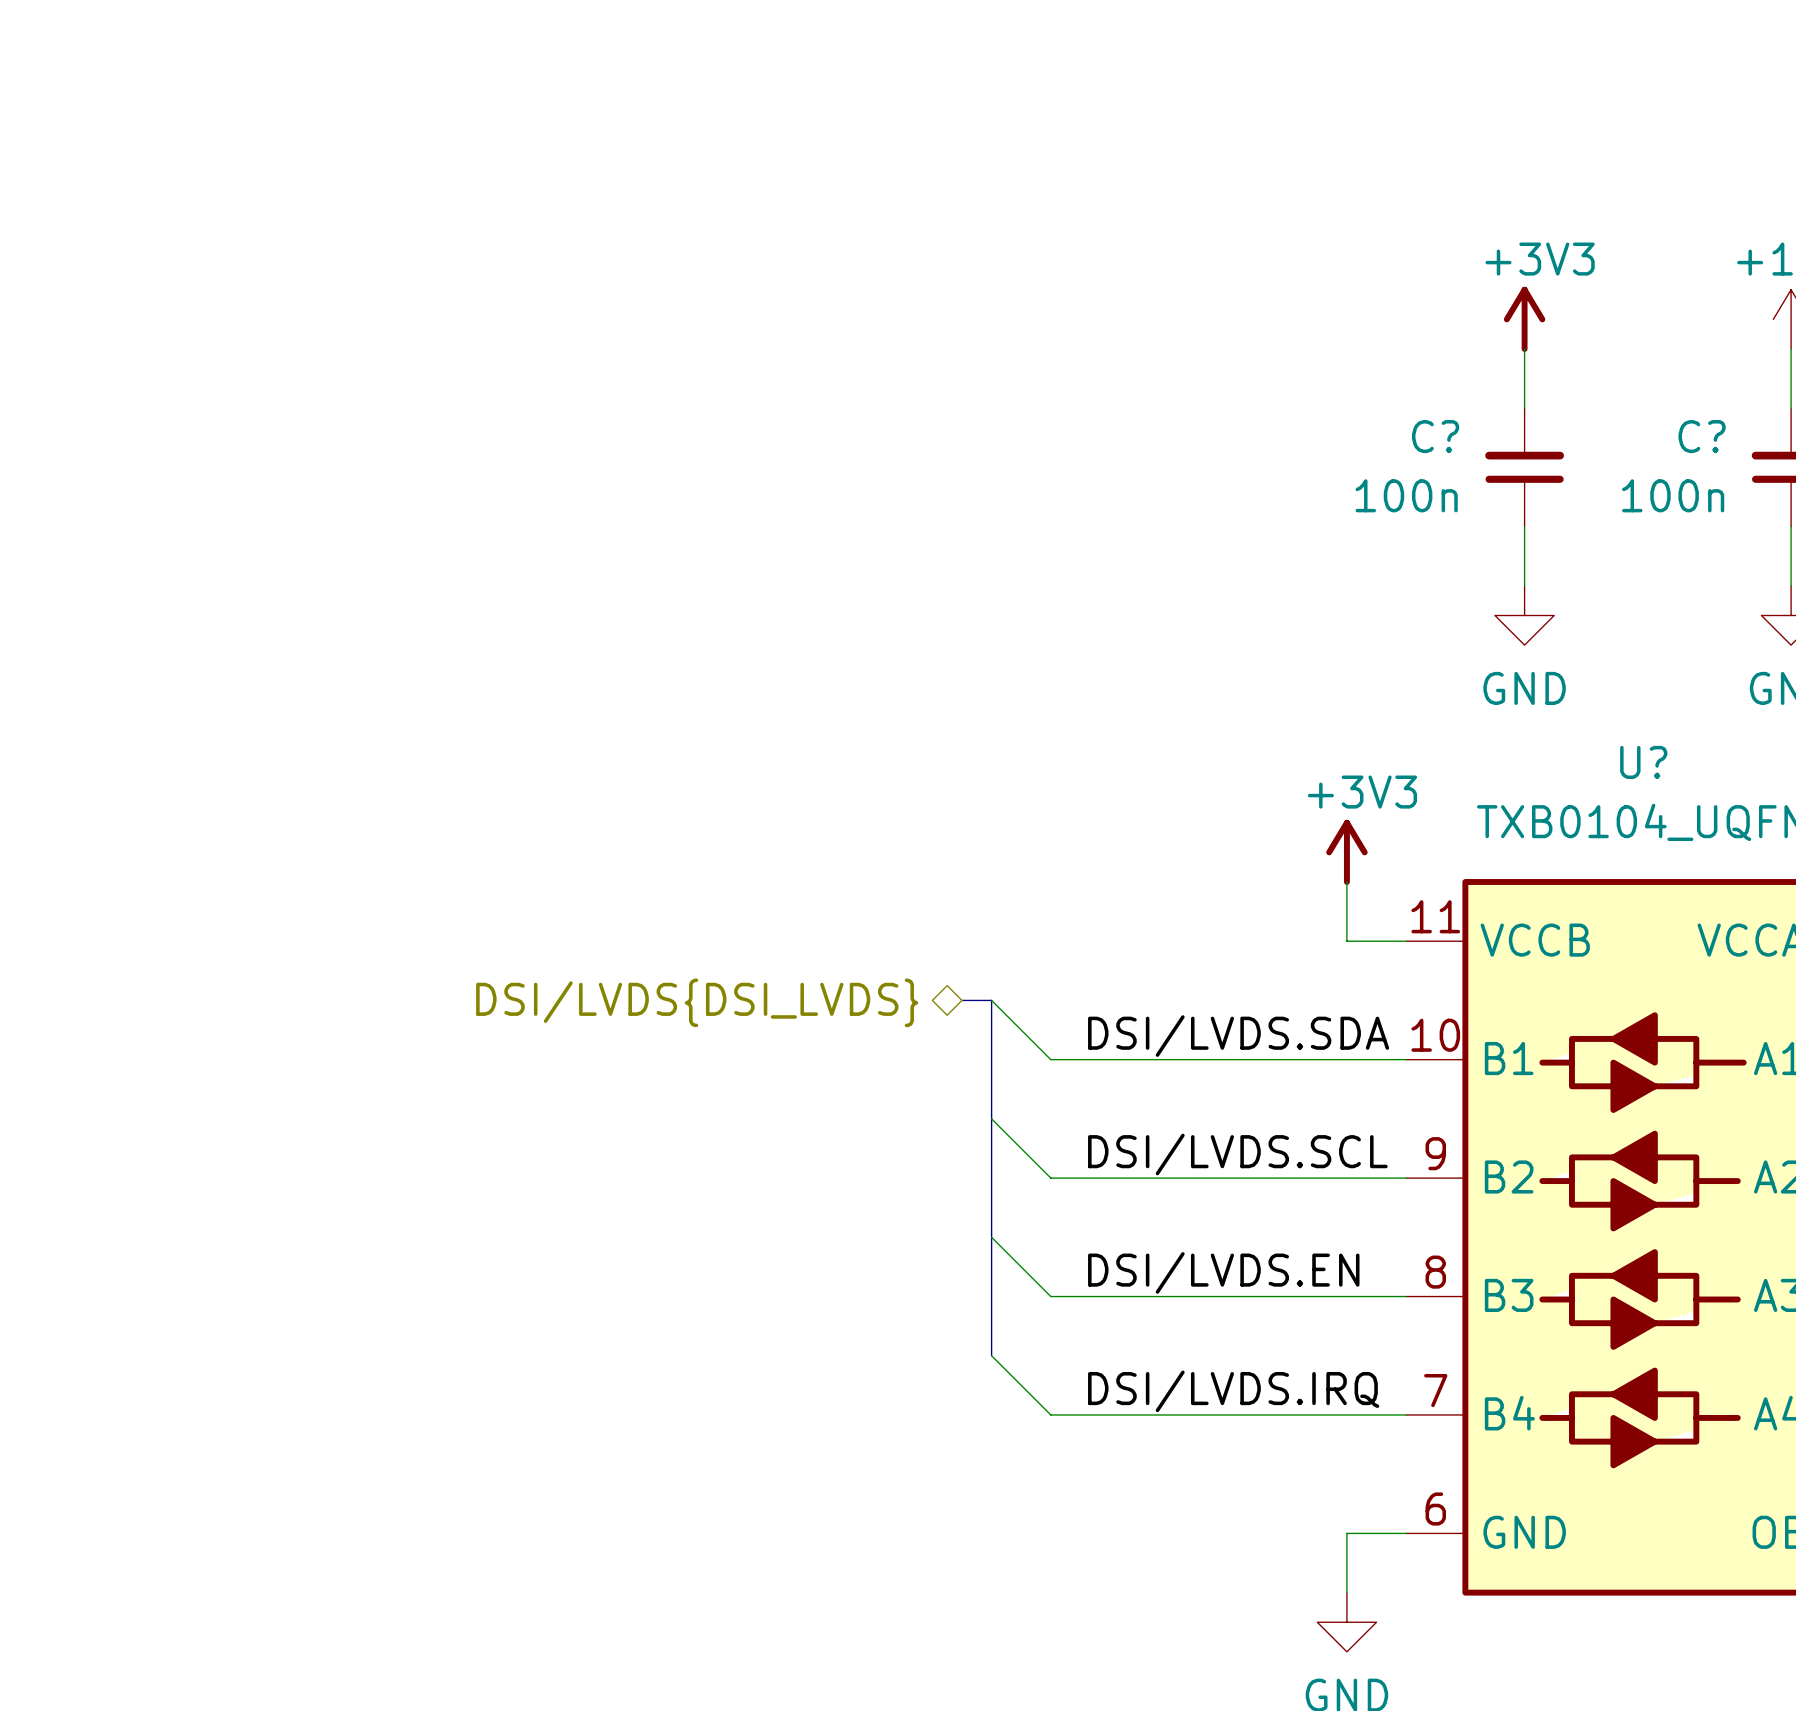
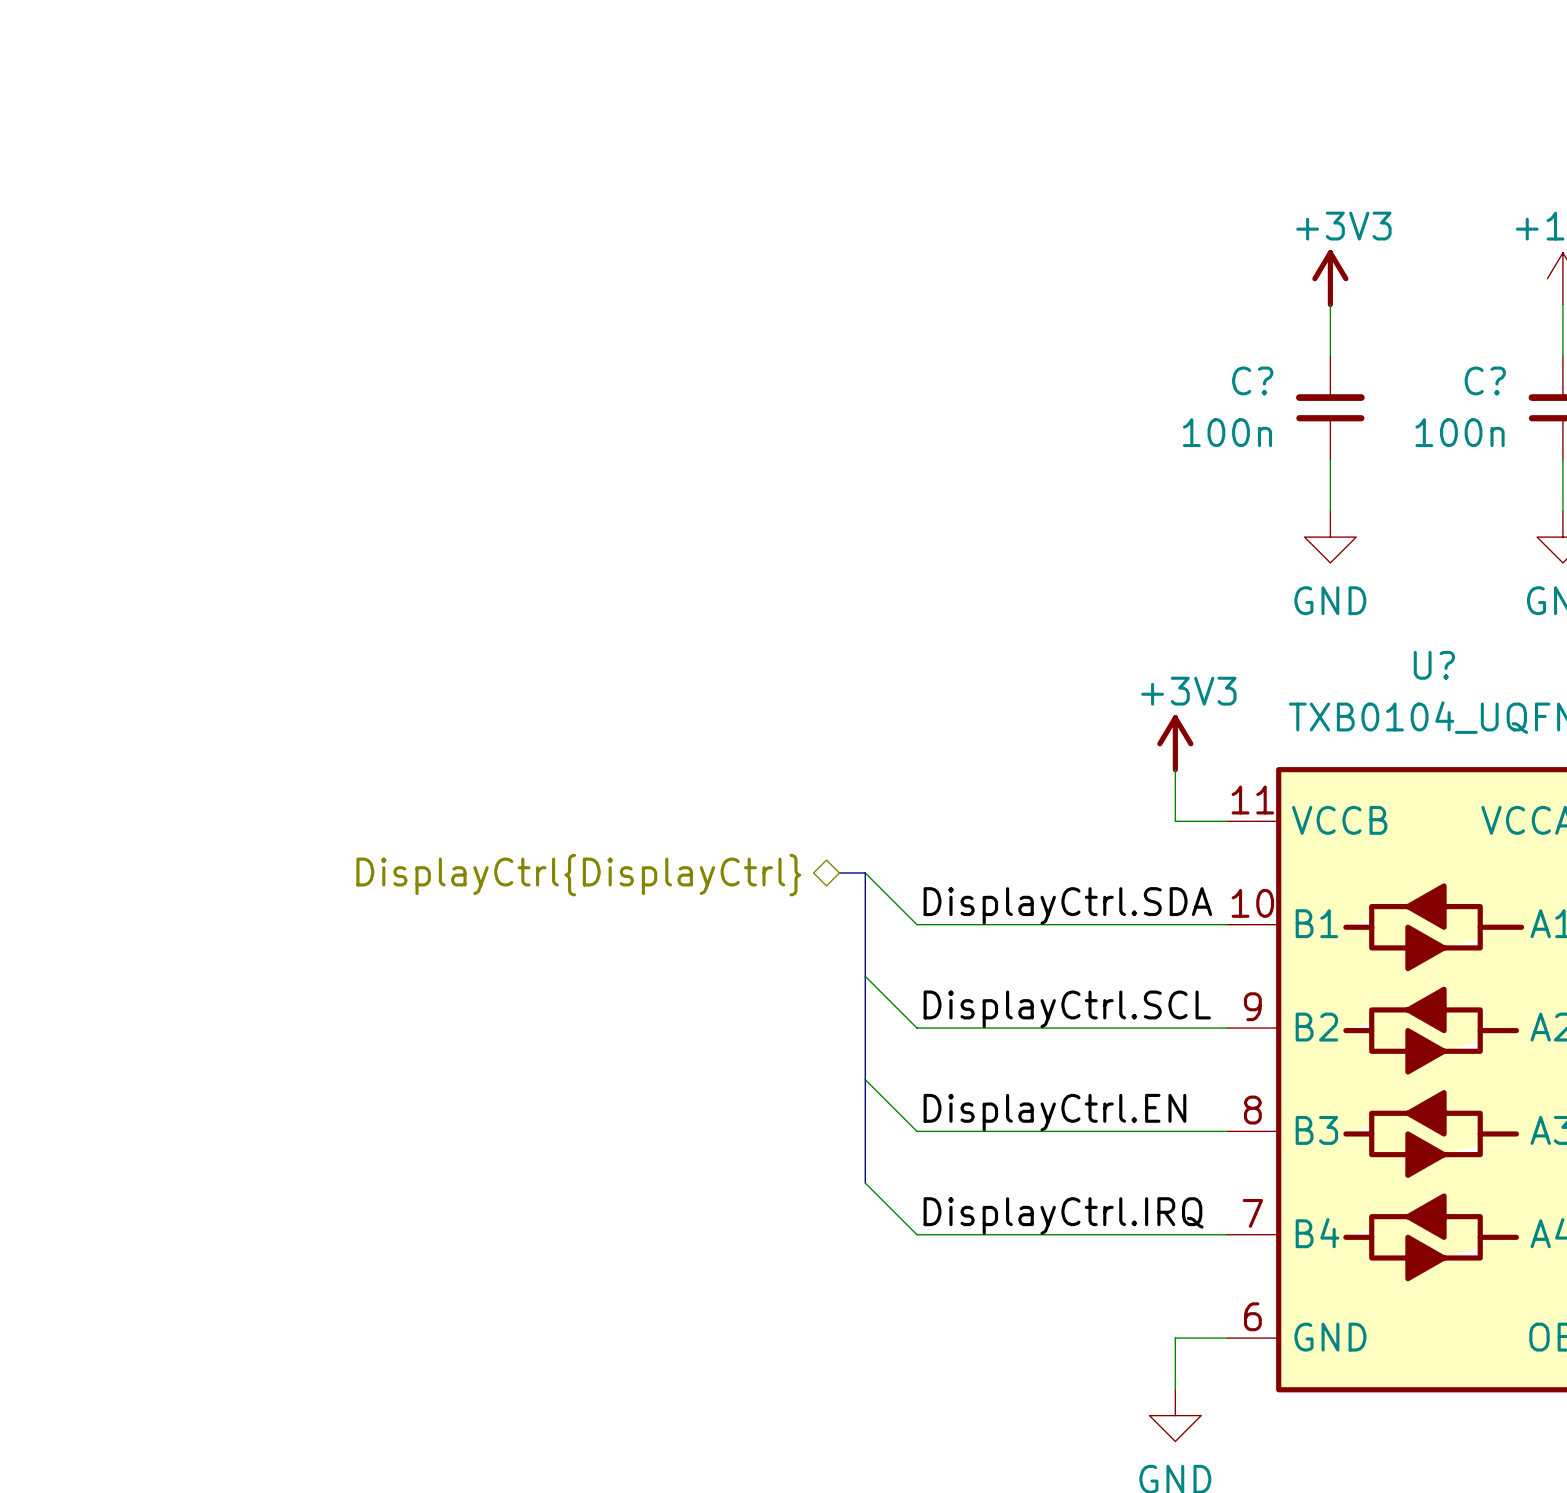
hierarchical label: DSI/LVDS{DSI_LVDS} (697, 1002) -> DisplayCtrl{DisplayCtrl} (578, 875)
label: DSI/LVDS.SDA (1238, 1036) -> none
label: none -> DisplayCtrl.SDA (1067, 905)
label: DSI/LVDS.SCL (1237, 1154) -> none
label: none -> DisplayCtrl.SCL (1067, 1009)
label: DSI/LVDS.EN (1223, 1272) -> none
label: none -> DisplayCtrl.EN (1054, 1112)
label: DSI/LVDS.IRQ (1233, 1391) -> none
label: none -> DisplayCtrl.IRQ (1063, 1215)

